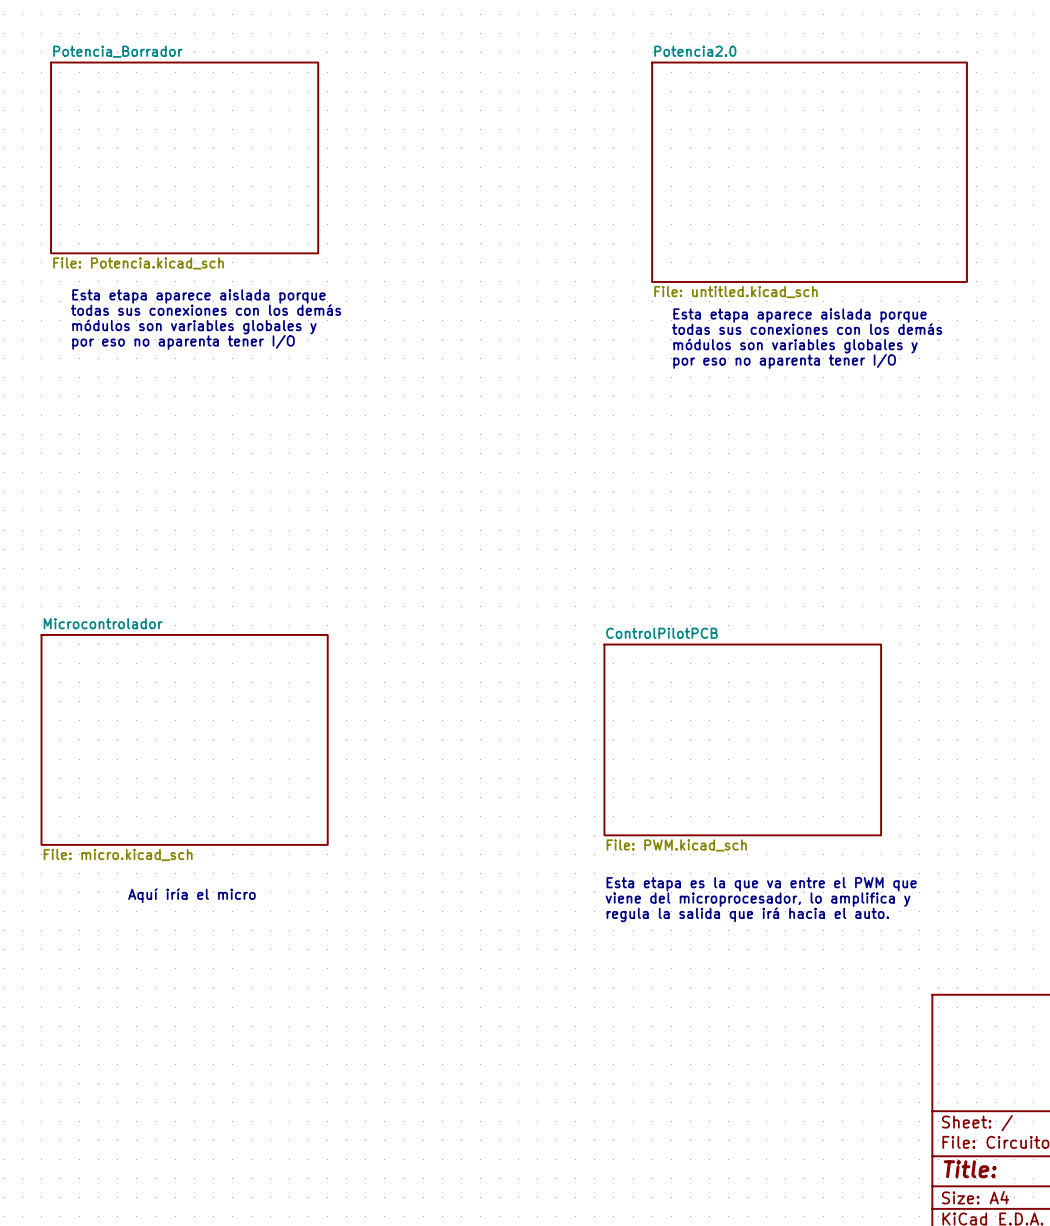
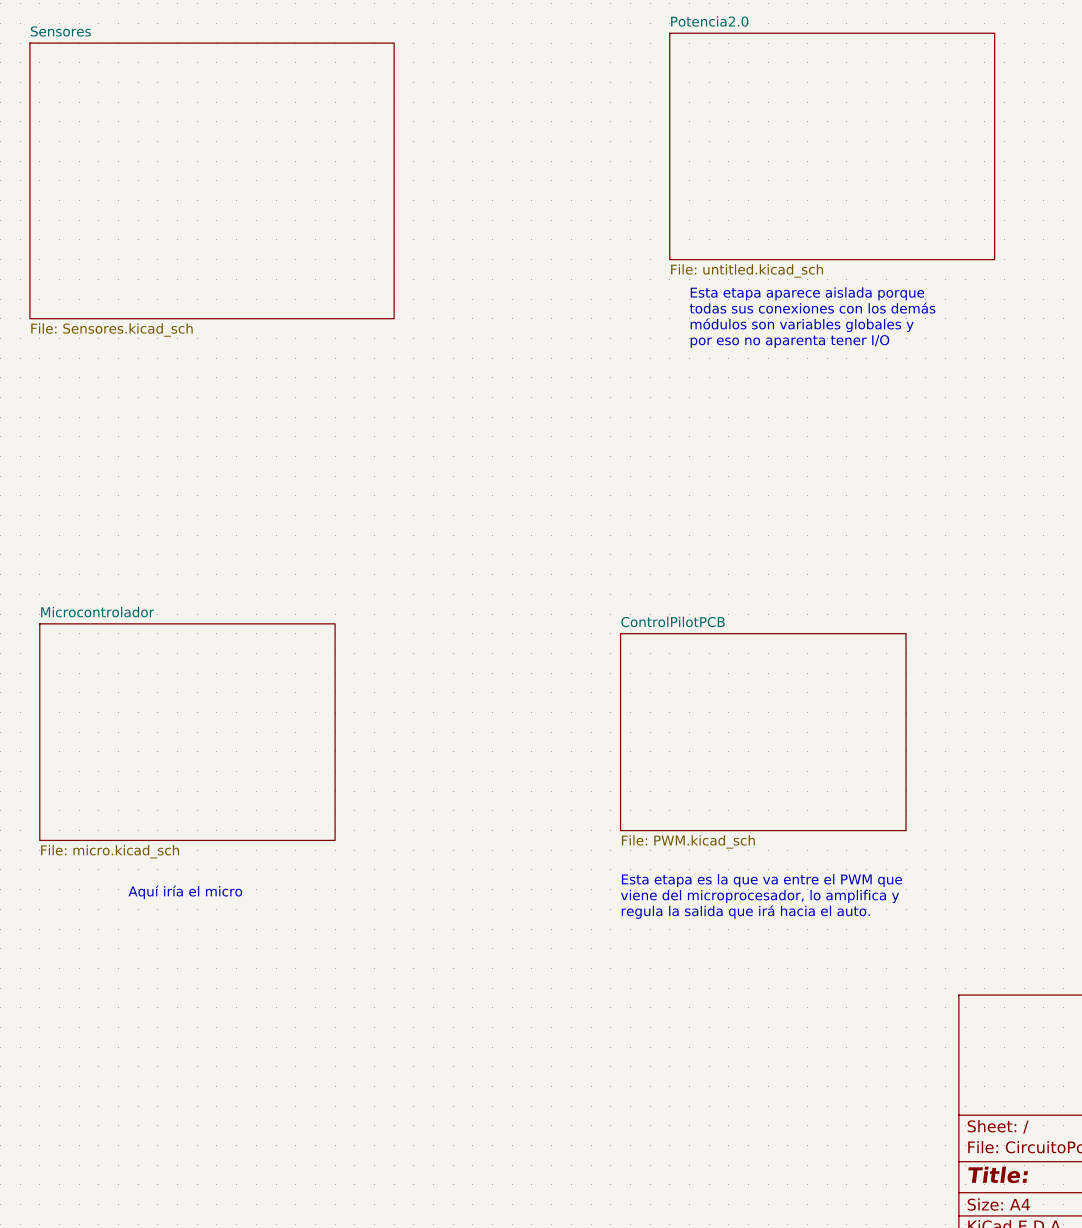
sheet Potencia_Borrador: File: Potencia.kicad_sch (184, 157) -> none
sheet Sensores: none -> File: Sensores.kicad_sch (212, 180)
text: Esta etapa aparece aislada porque (199, 296) -> none
text: todas sus conexiones con los demás (206, 309) -> none
text: módulos son variables globales y (194, 326) -> none
text: por eso no aparenta tener I/O (183, 342) -> none

